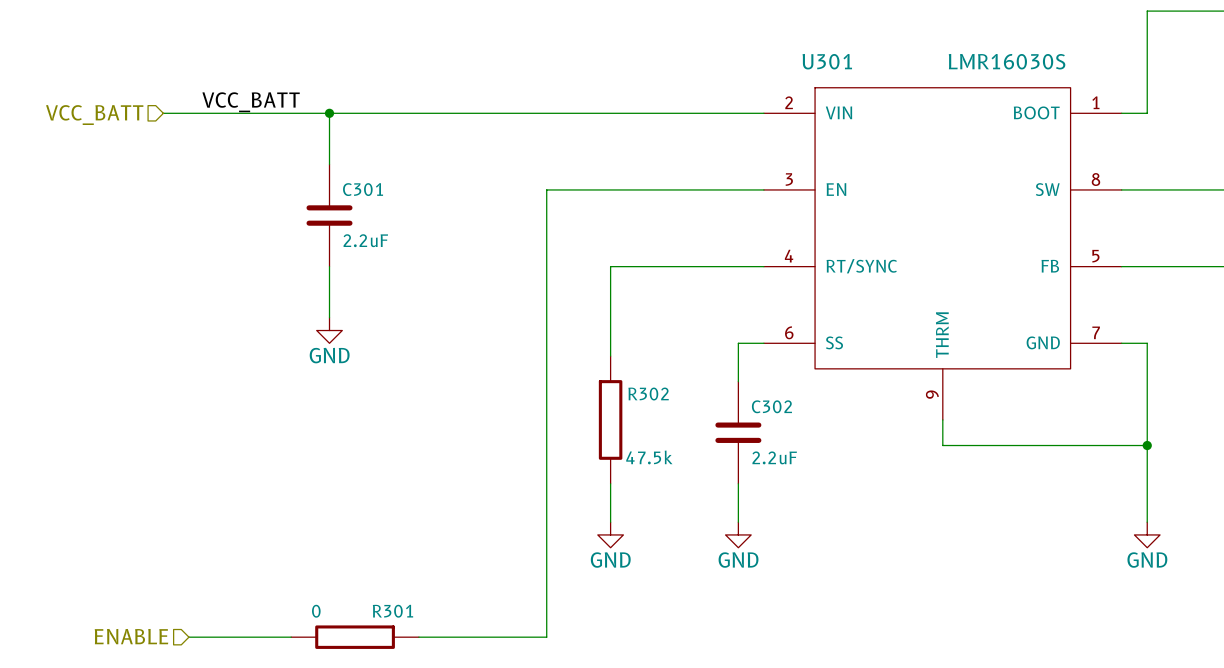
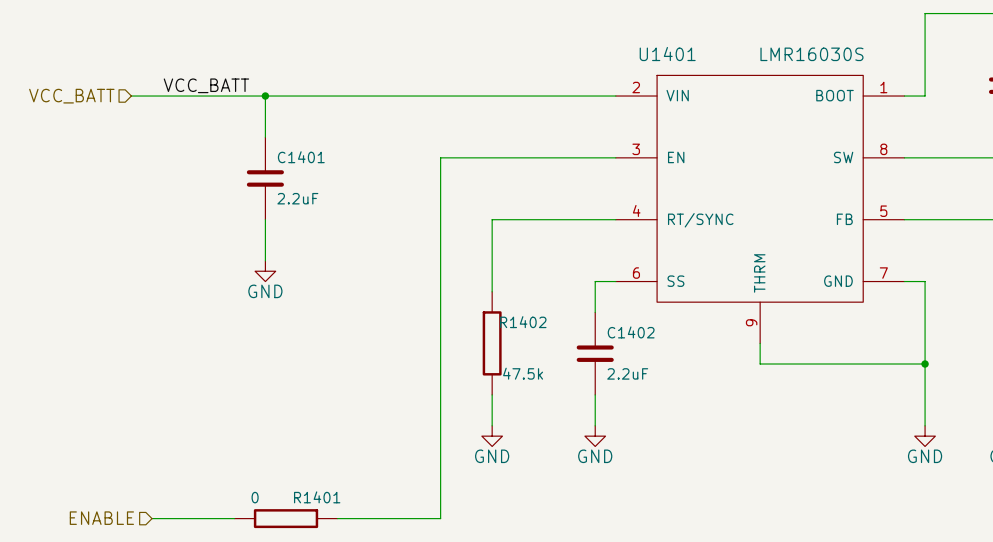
U301 name: U301 (827, 61) -> U1401 (667, 54)
C301 name: C301 (363, 189) -> C1401 (301, 157)
R302 name: R302 (648, 394) -> R1402 (523, 322)
C302 name: C302 (771, 406) -> C1402 (631, 332)
R301 name: R301 (392, 611) -> R1401 (317, 497)

